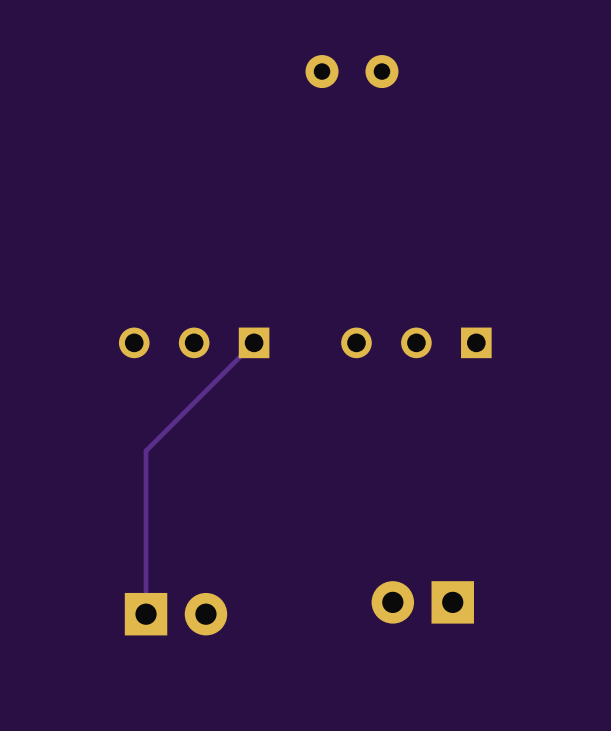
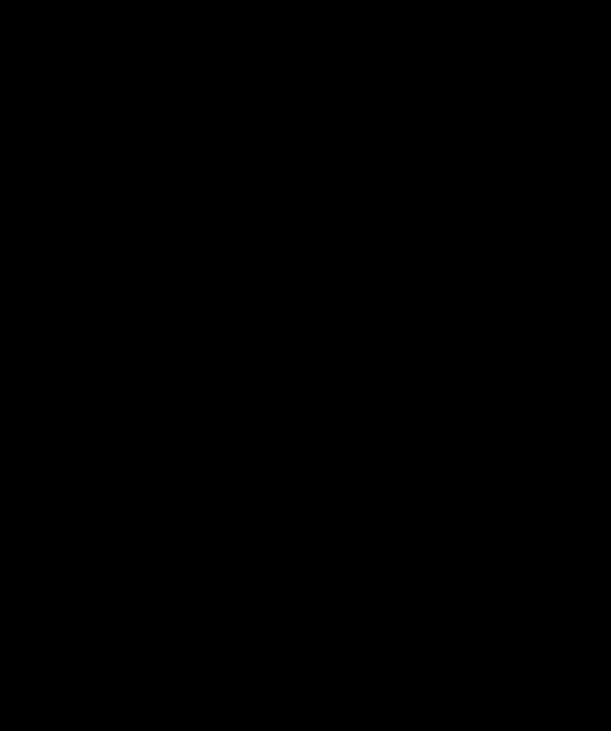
part: (352, 71) -> none
part: (194, 342) -> none
track: (254, 342) (146, 450) (146, 614) -> none
part: (416, 342) -> none
part: (422, 602) -> none
part: (175, 614) -> none

